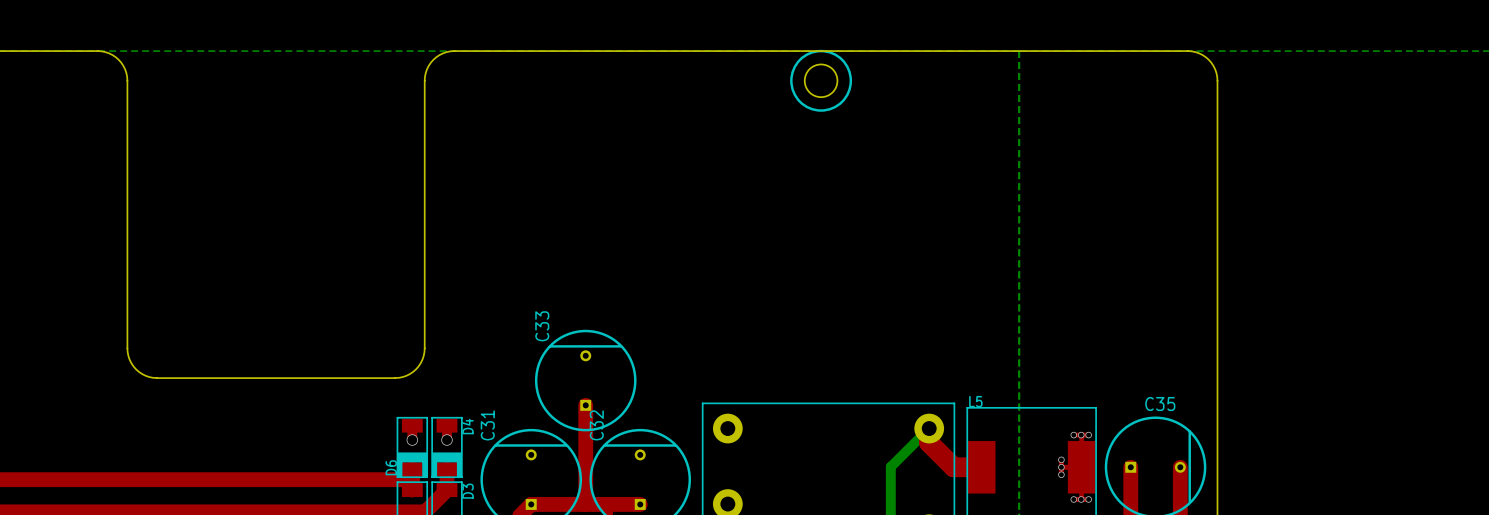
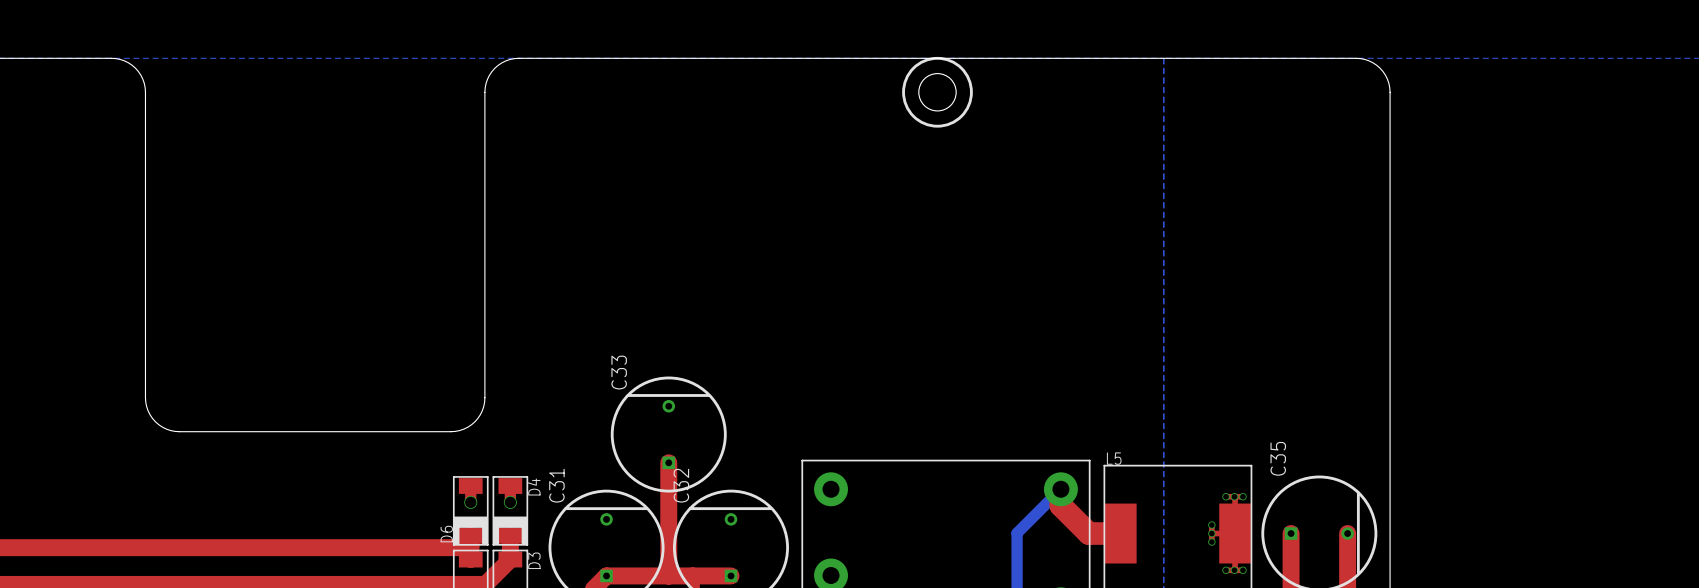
C35 name rotation: 0° (1160, 404) -> 90° counterclockwise (1278, 458)
C35 name position: C35 (1160, 404) -> C35 (1278, 458)

